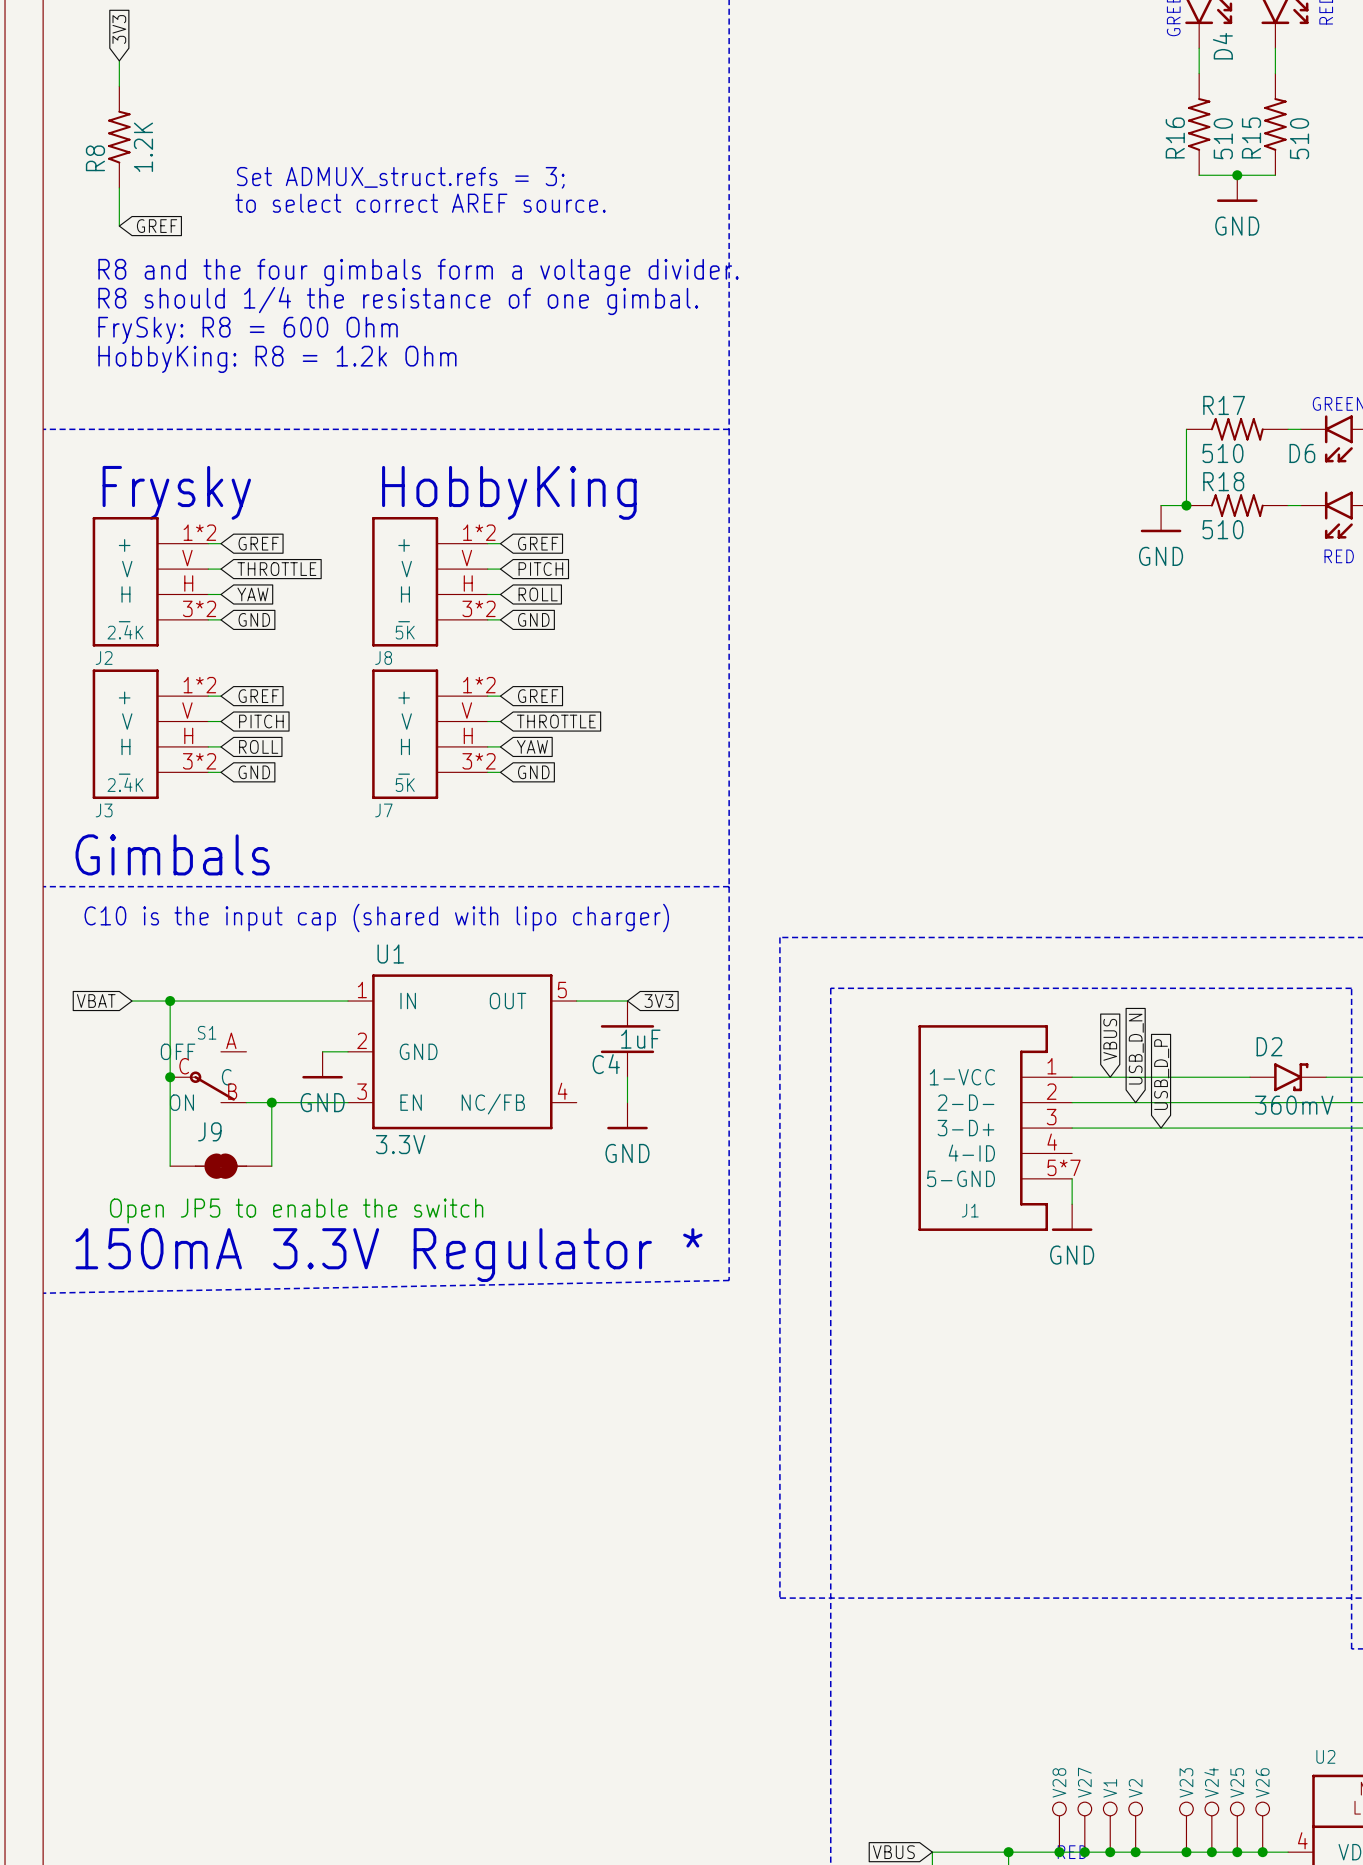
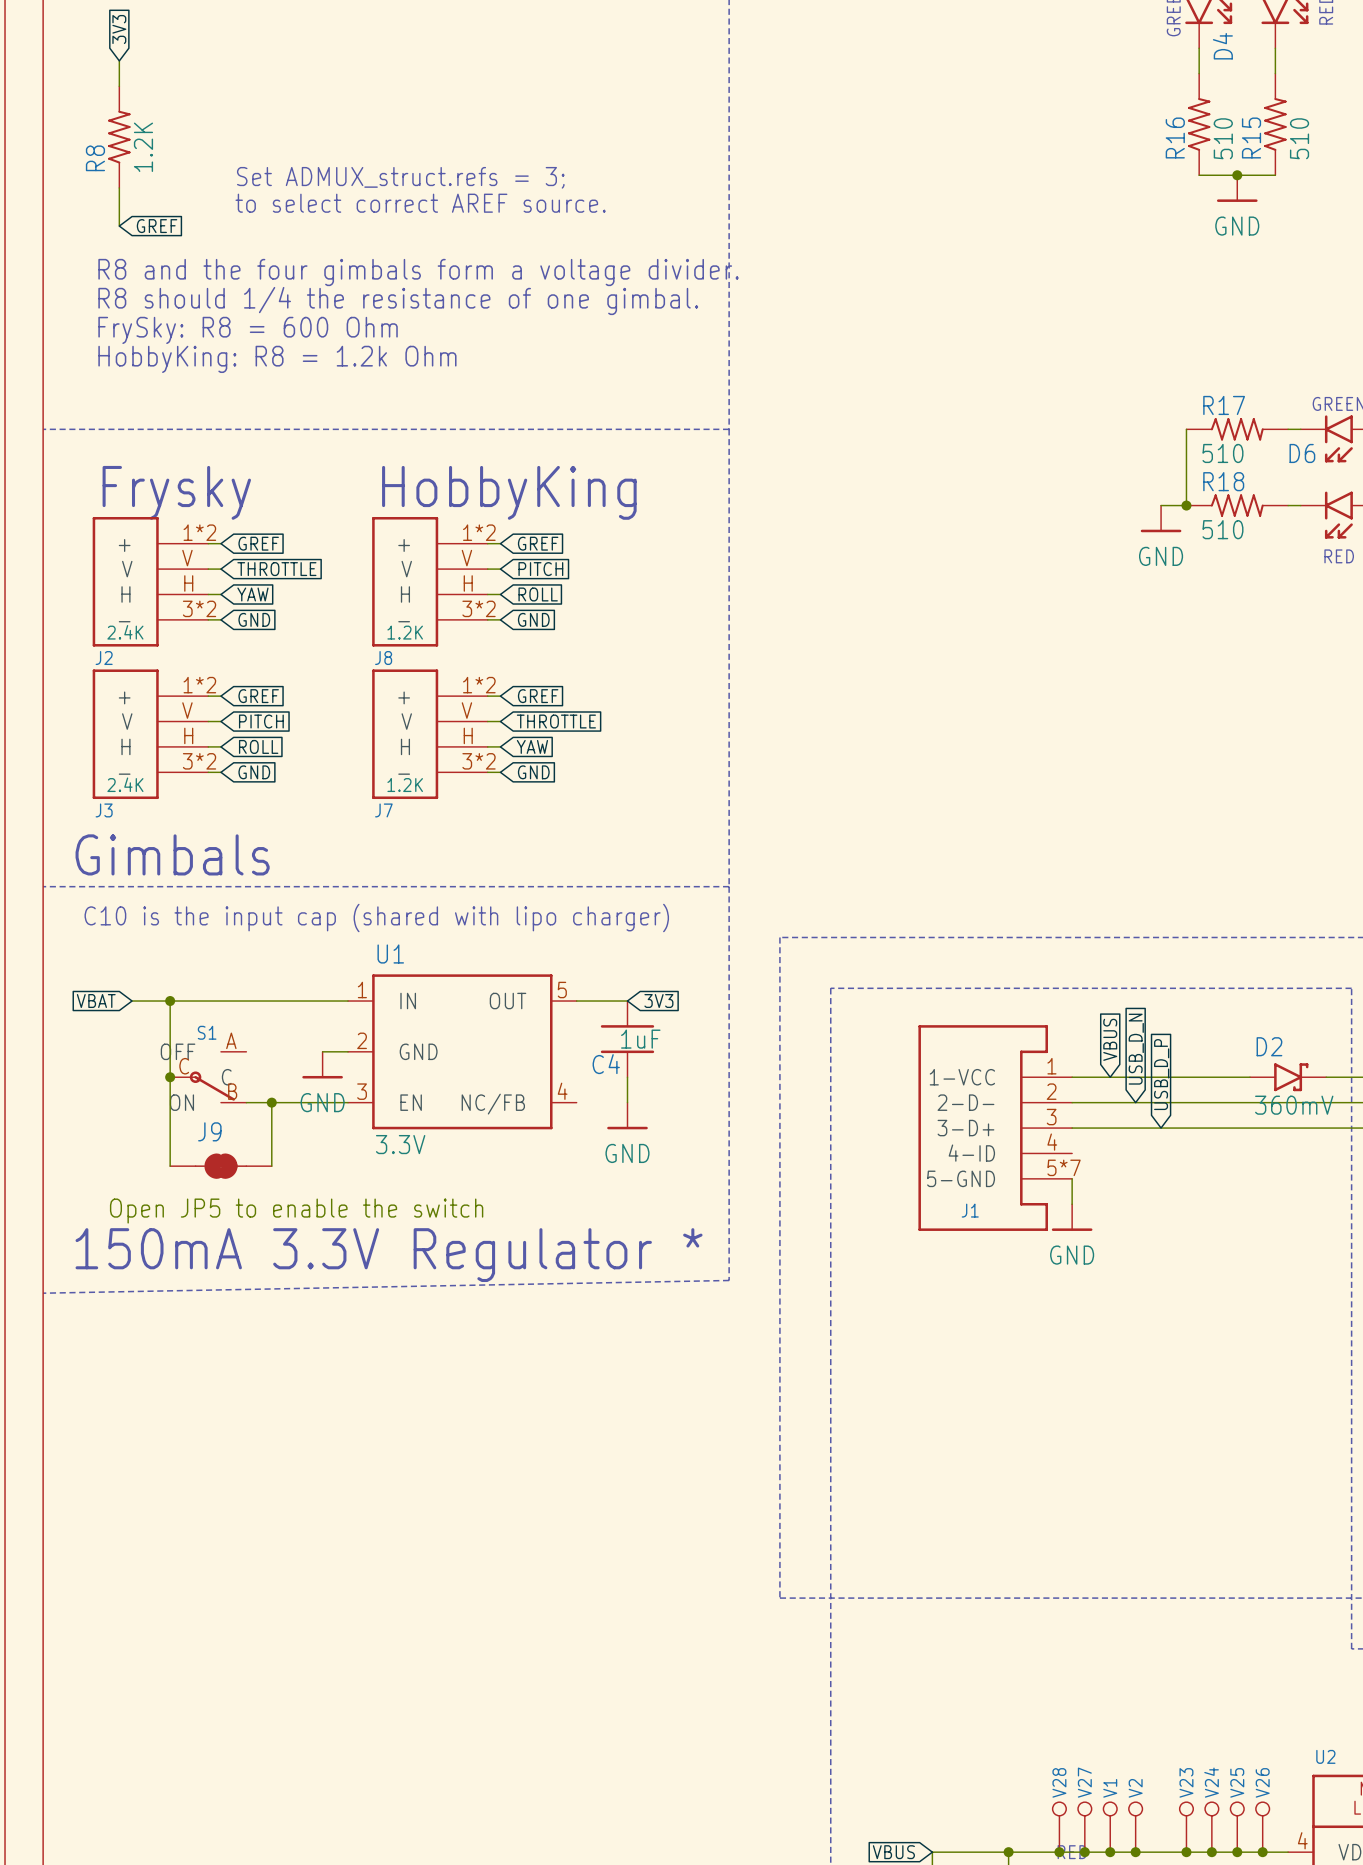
J8 value: 5K (405, 632) -> 1.2K (405, 632)
J7 value: 5K (405, 785) -> 1.2K (405, 785)

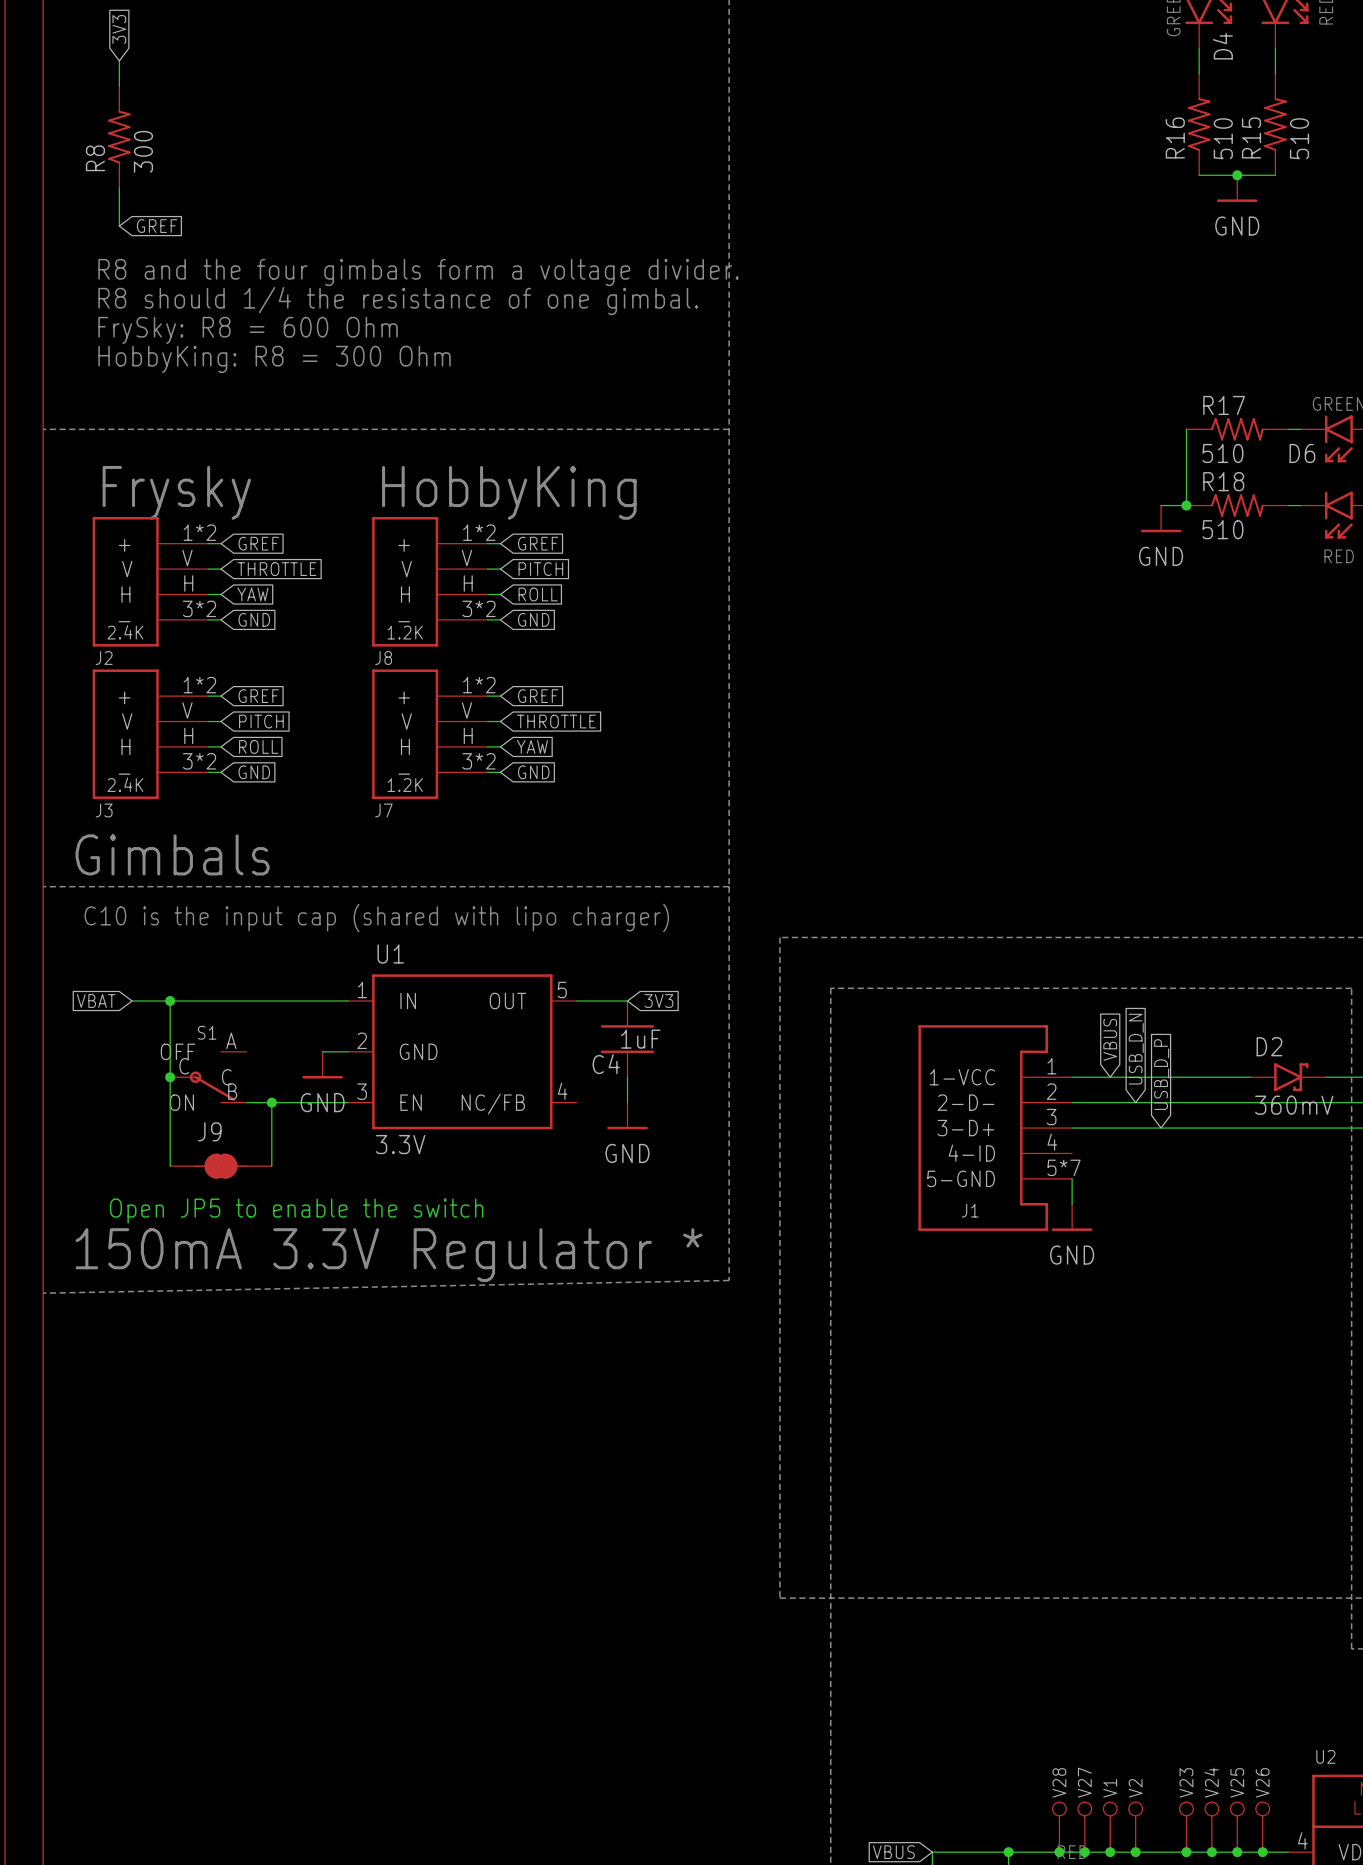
R8 value: 1.2K (143, 147) -> 300 (143, 151)
text: Set ADMUX_struct.refs = 3; (400, 177) -> none
text: to select correct AREF source. (420, 203) -> none
text: HobbyKing: R8 = 1.2k Ohm (277, 359) -> HobbyKing: R8 = 300 Ohm (274, 359)

